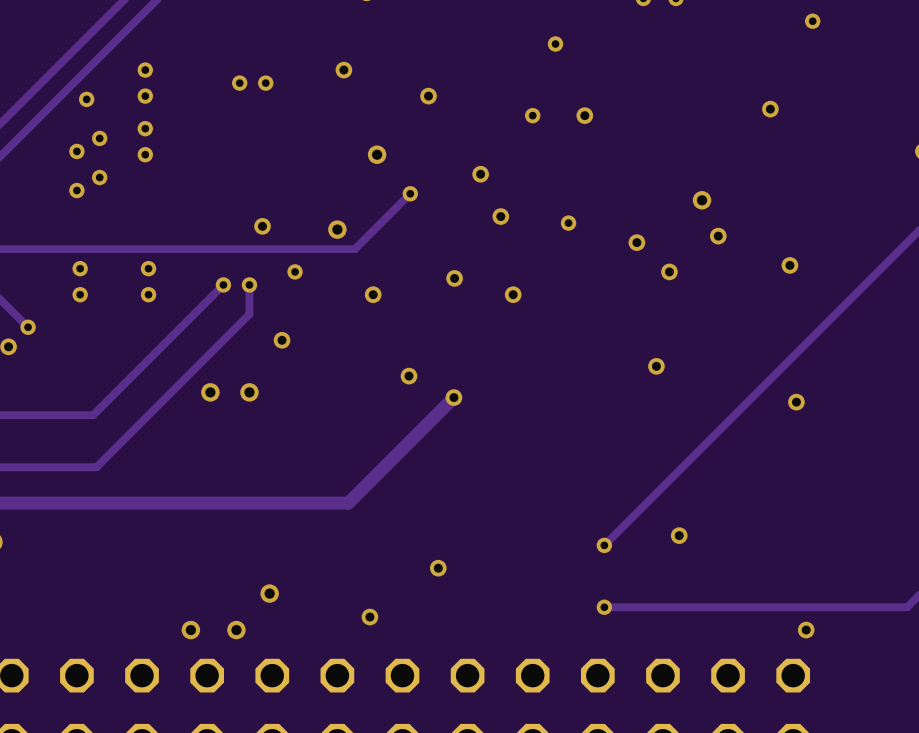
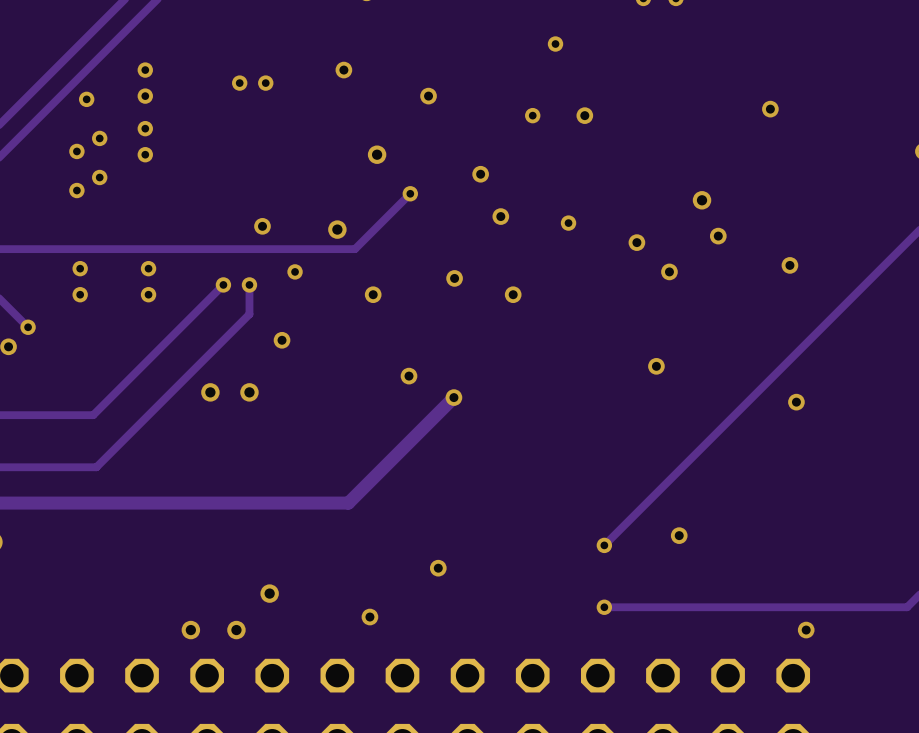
via: (812, 21) -> none

